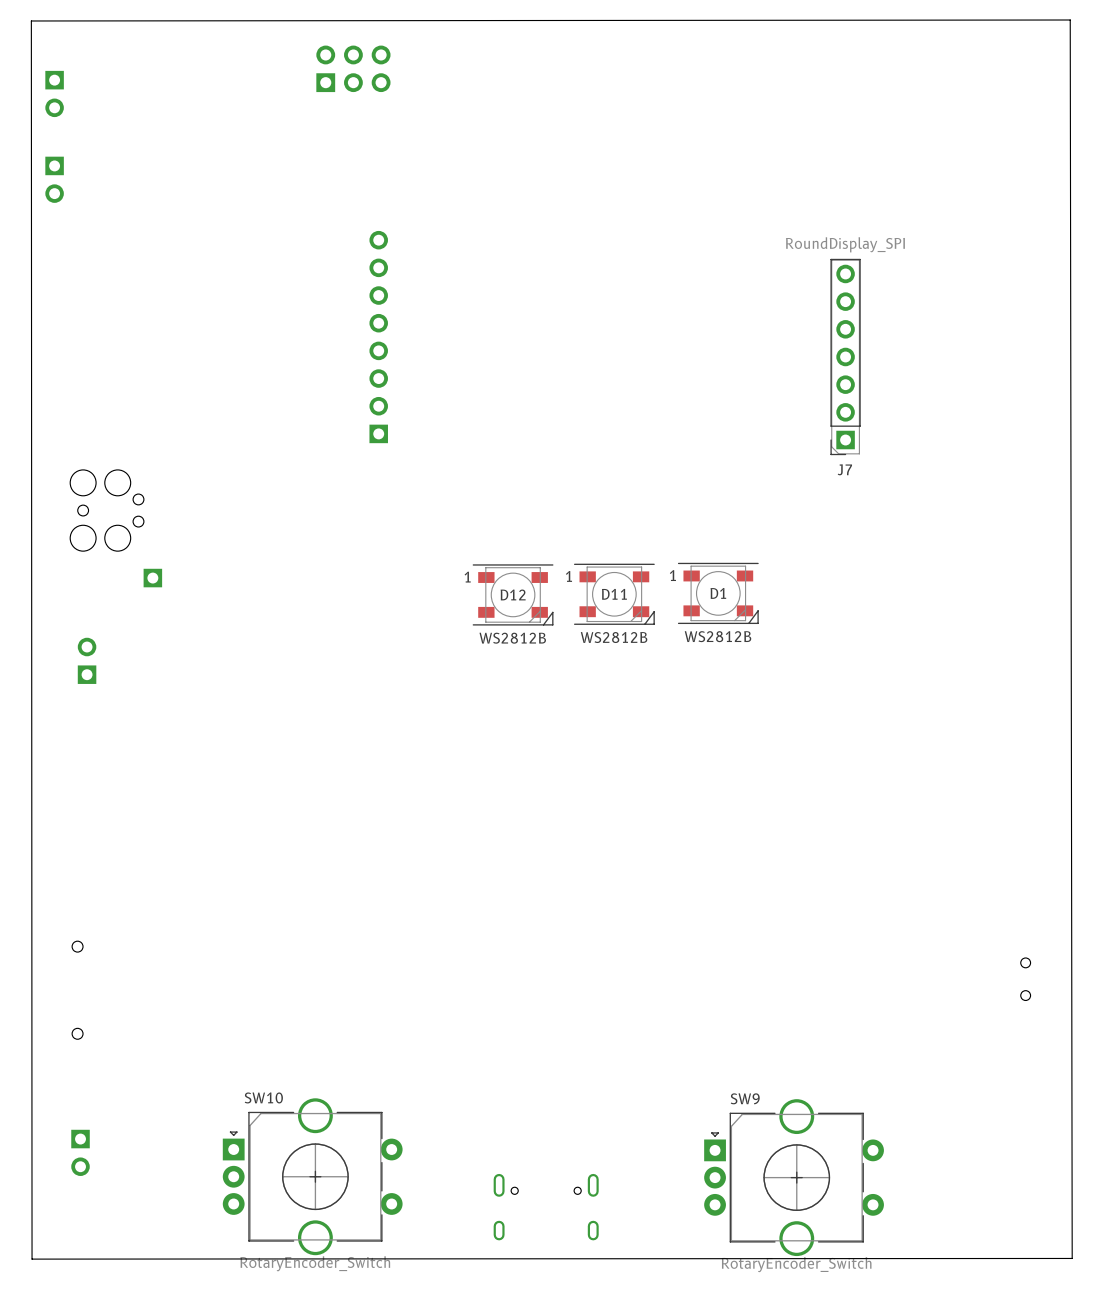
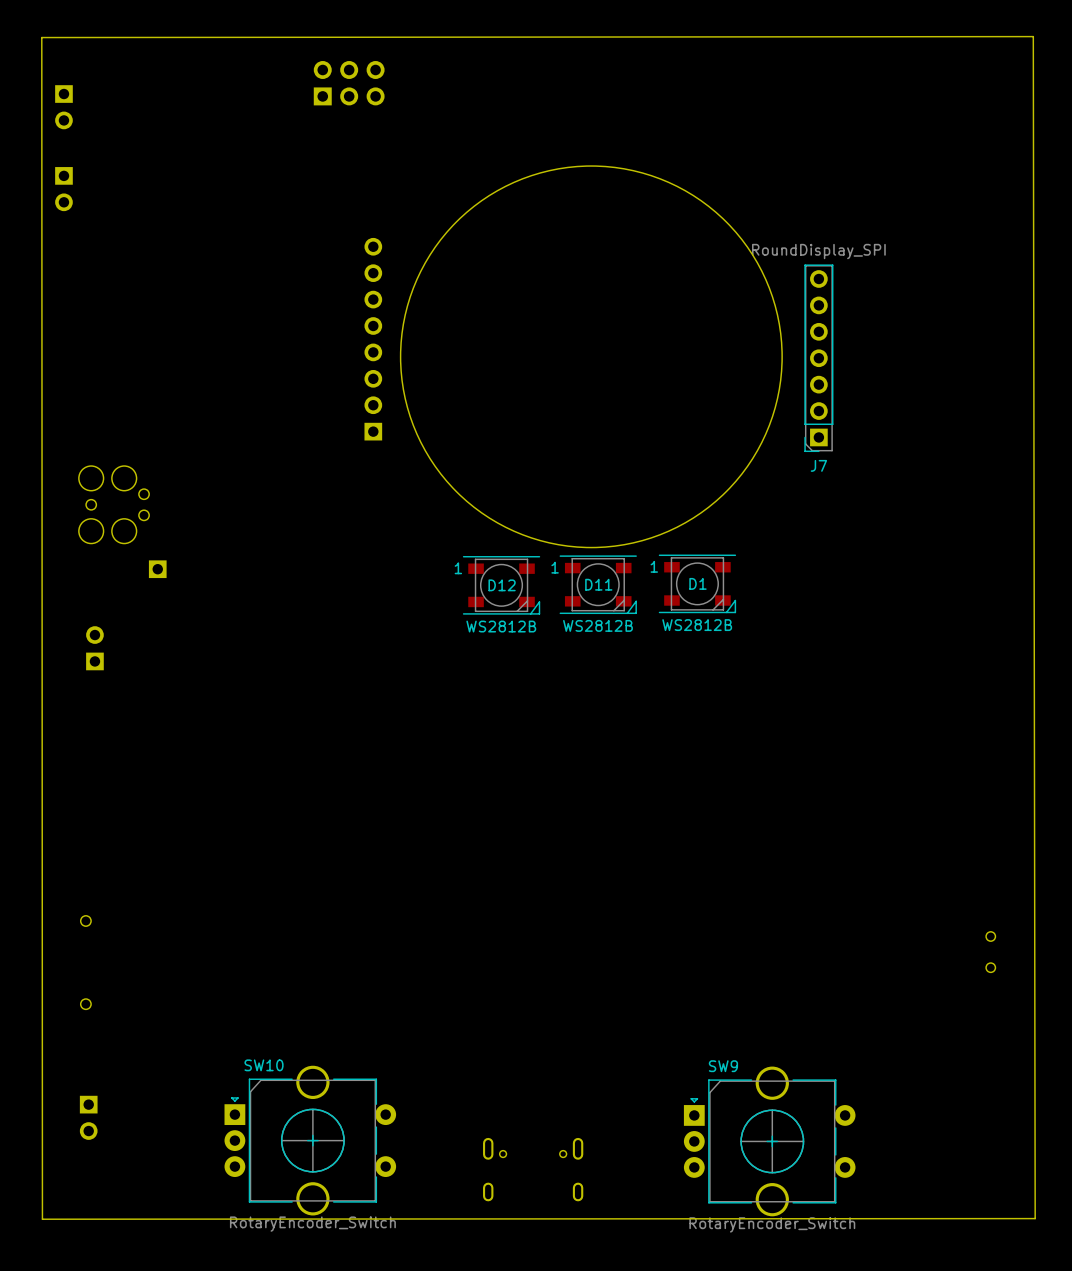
round board edge: none -> [400, 165, 783, 549]

